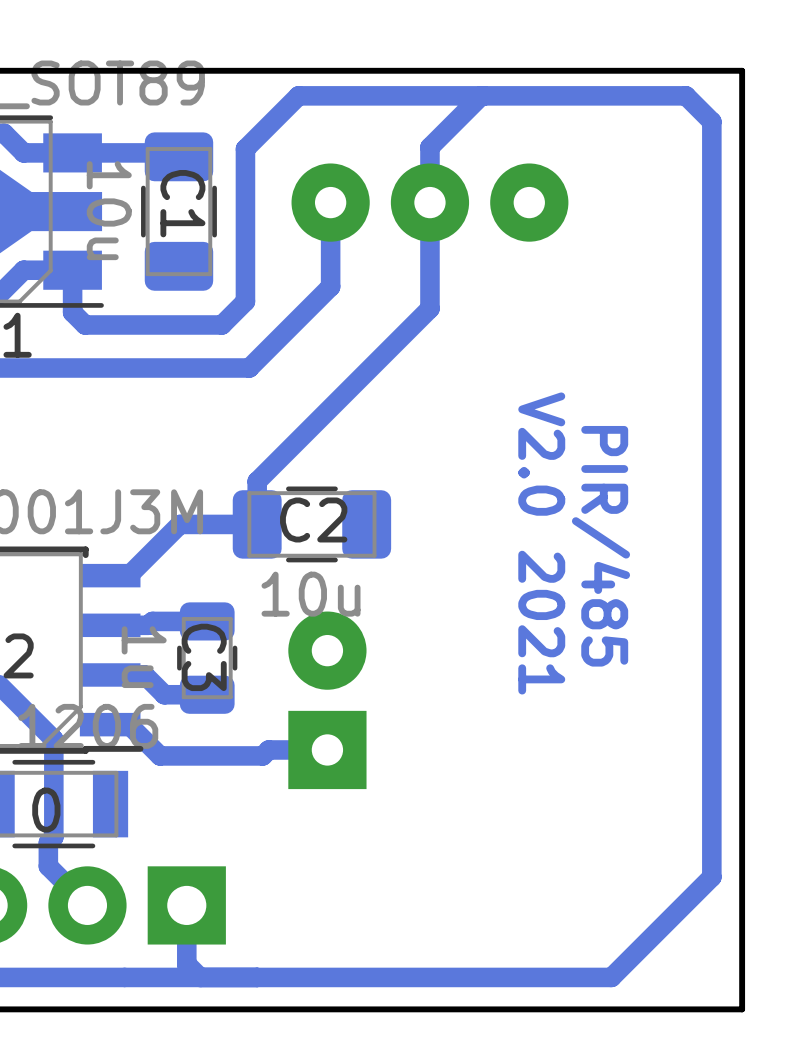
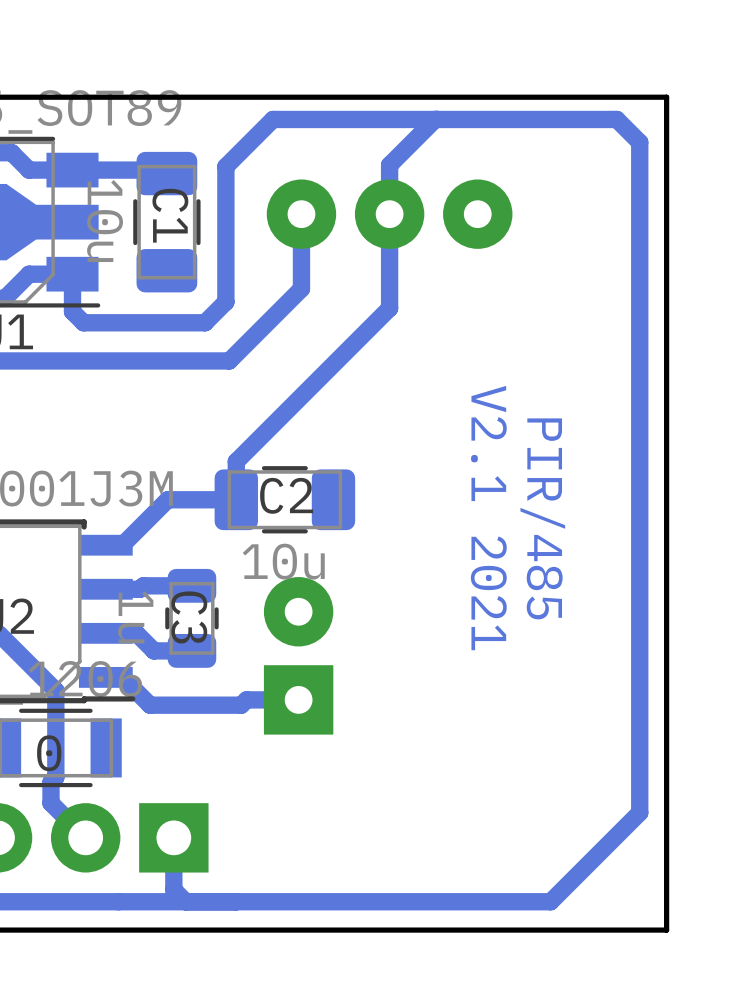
text: V2.0 2021 (541, 543) -> V2.1 2021 (488, 518)

